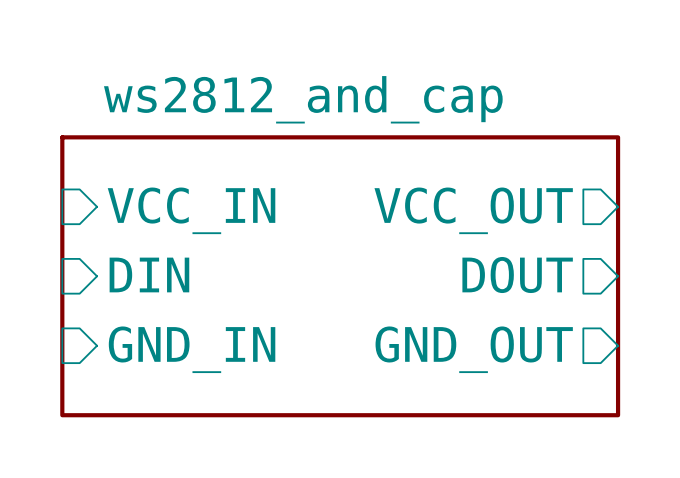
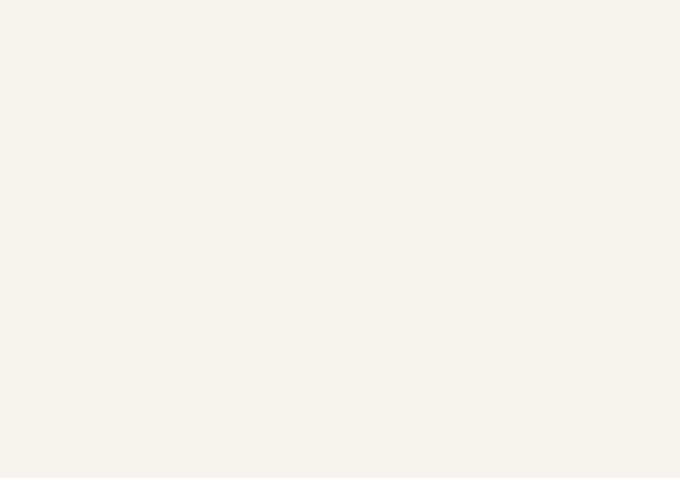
sheet pin: VCC_IN (191, 210) -> none
sheet pin: VCC_OUT (473, 210) -> none
sheet pin: DIN (149, 274) -> none
sheet pin: DOUT (517, 275) -> none
sheet ws2812_and_cap: (340, 276) -> none
sheet pin: GND_IN (192, 349) -> none
sheet pin: GND_OUT (474, 349) -> none

